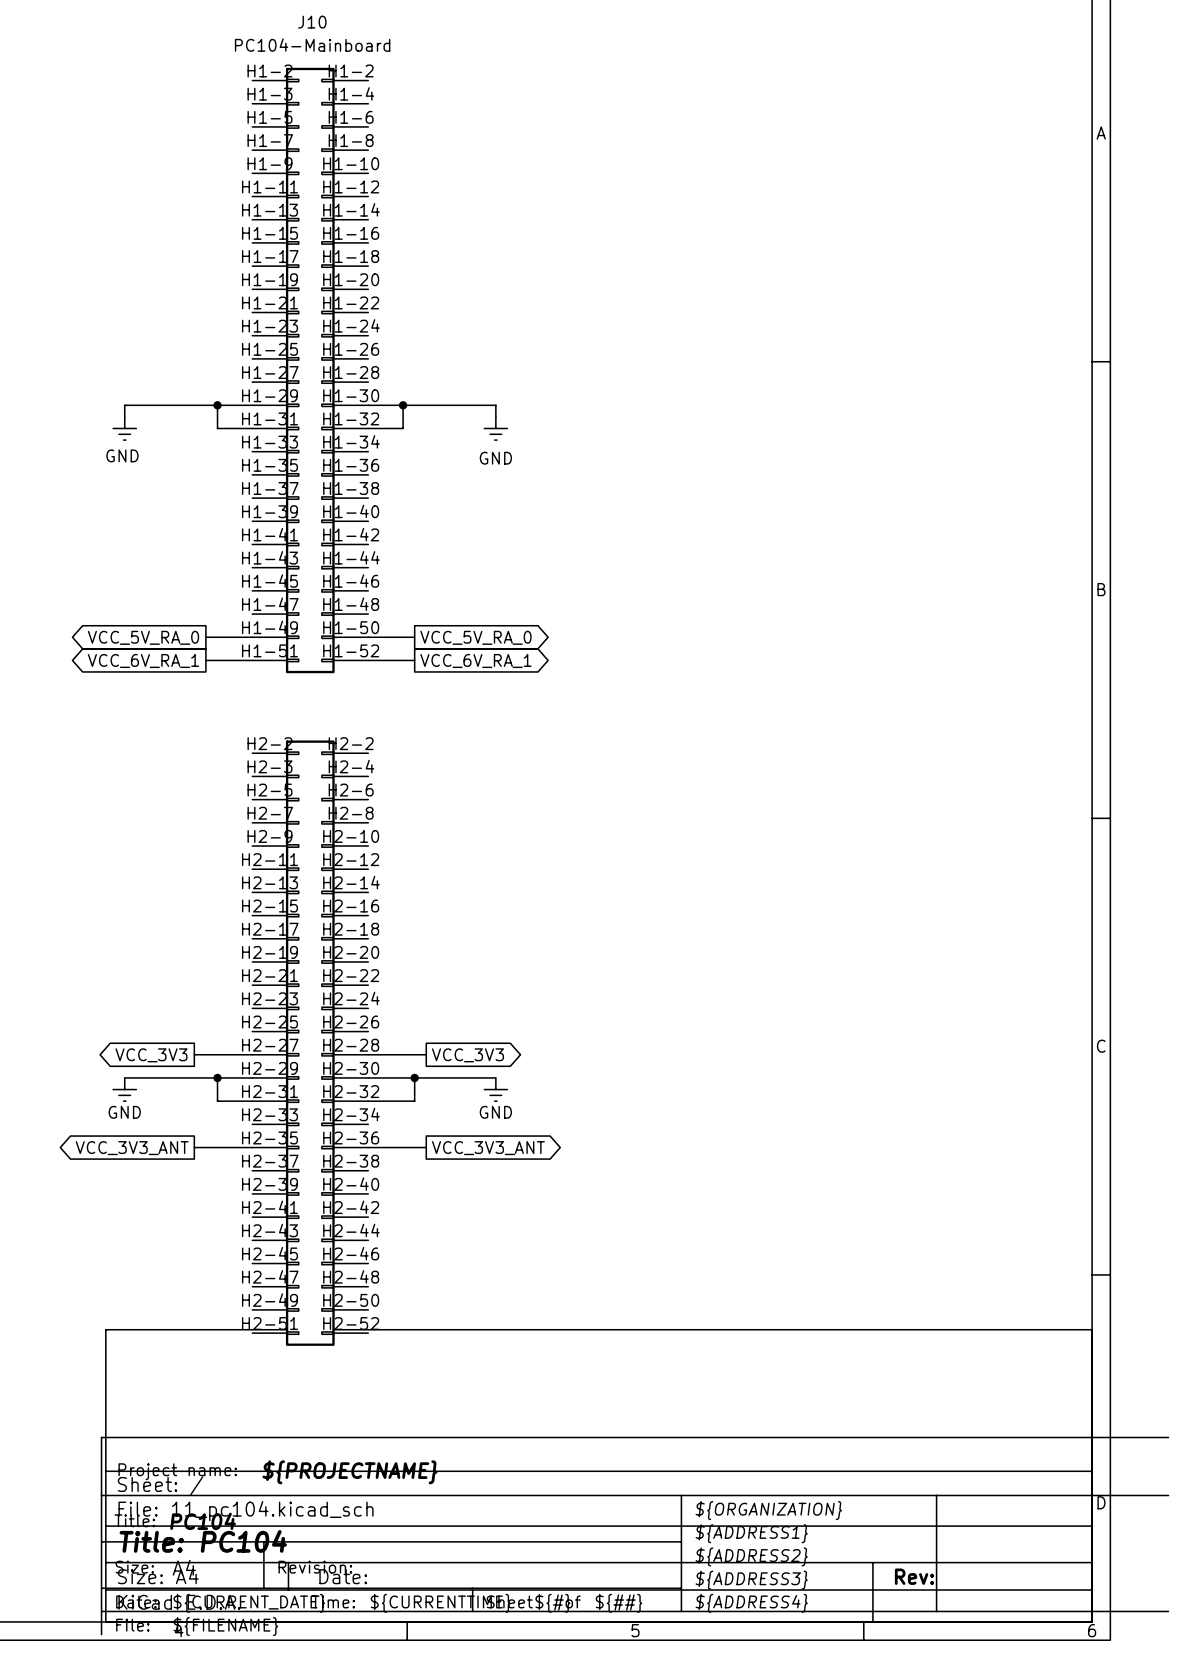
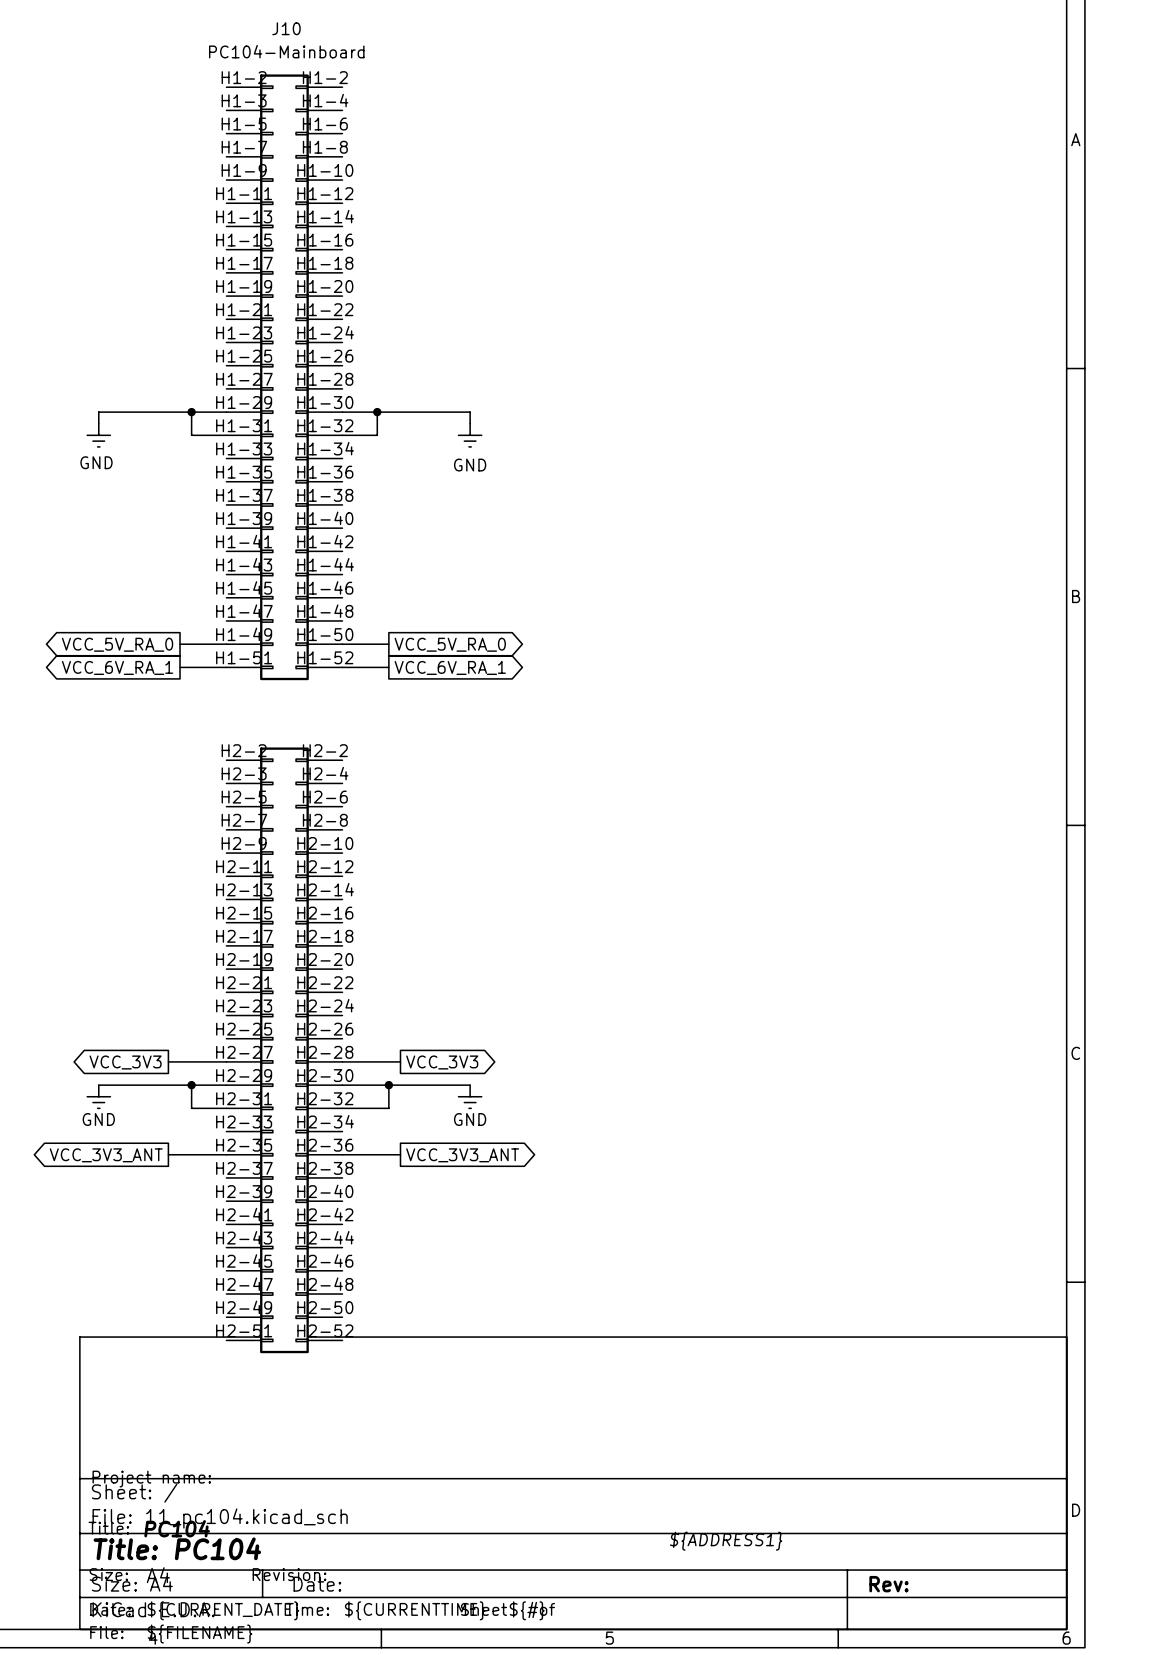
line: (1168, 1437) (101, 1437) (101, 1634) -> none
text: ${PROJECTNAME} (349, 1472) -> none
line: (101, 1495) (1168, 1495) -> none
line: (681, 1495) (681, 1611) -> none
line: (936, 1495) (936, 1611) -> none
text: ${ORGANIZATION} (768, 1510) -> none
line: (101, 1541) (681, 1541) -> none
line: (263, 1541) (263, 1588) -> none
text: ${ADDRESS2} (751, 1556) -> none
text: ${ADDRESS3} (751, 1580) -> none
line: (101, 1588) (681, 1588) -> none
line: (472, 1588) (472, 1611) -> none
text: ${##} (619, 1603) -> none
text: ${ADDRESS4} (751, 1603) -> none
line: (101, 1611) (1168, 1611) -> none

